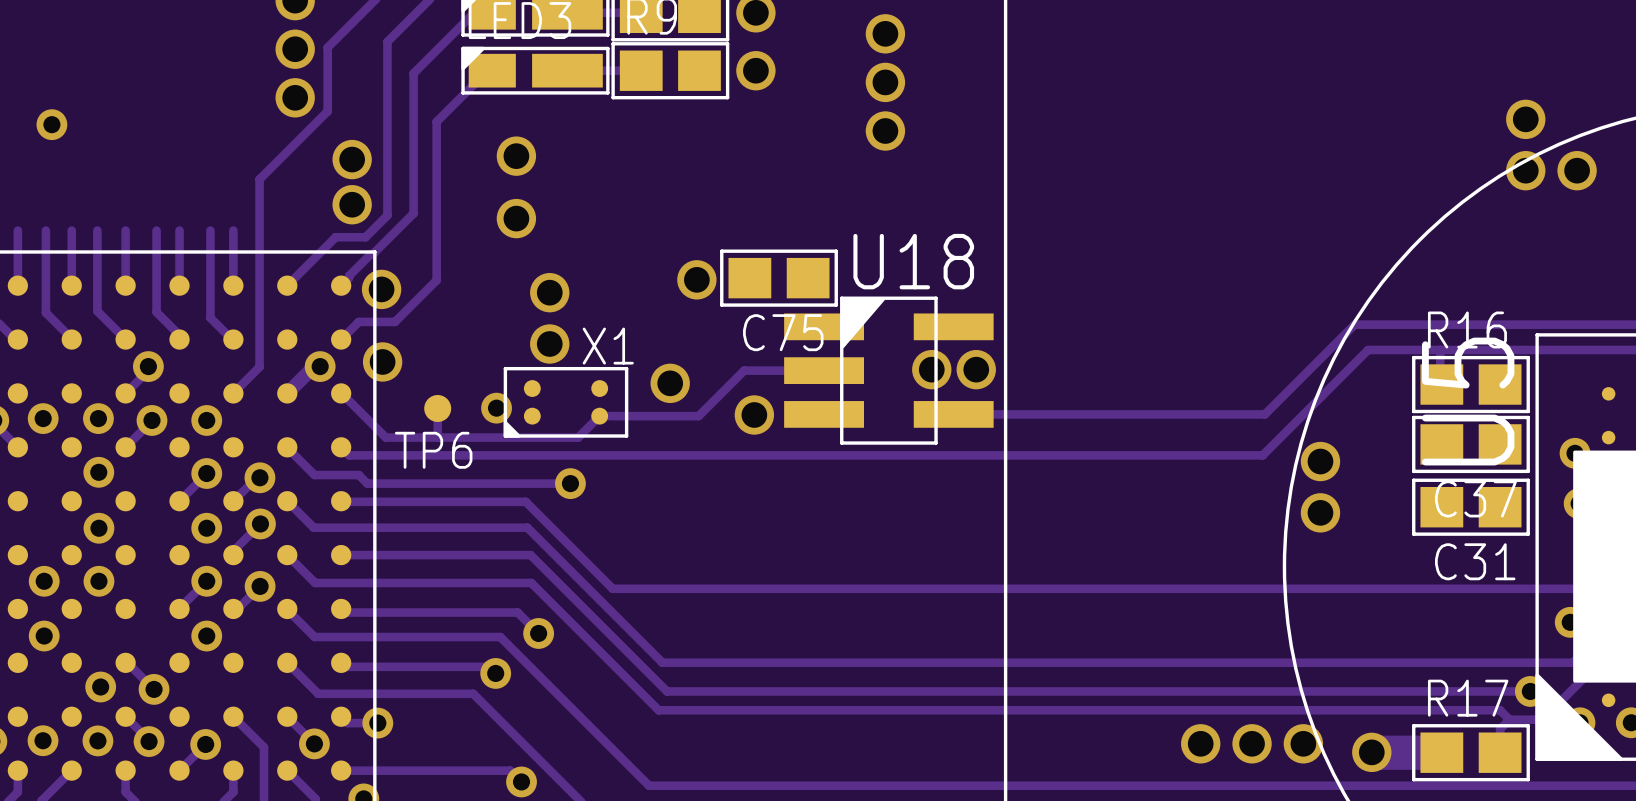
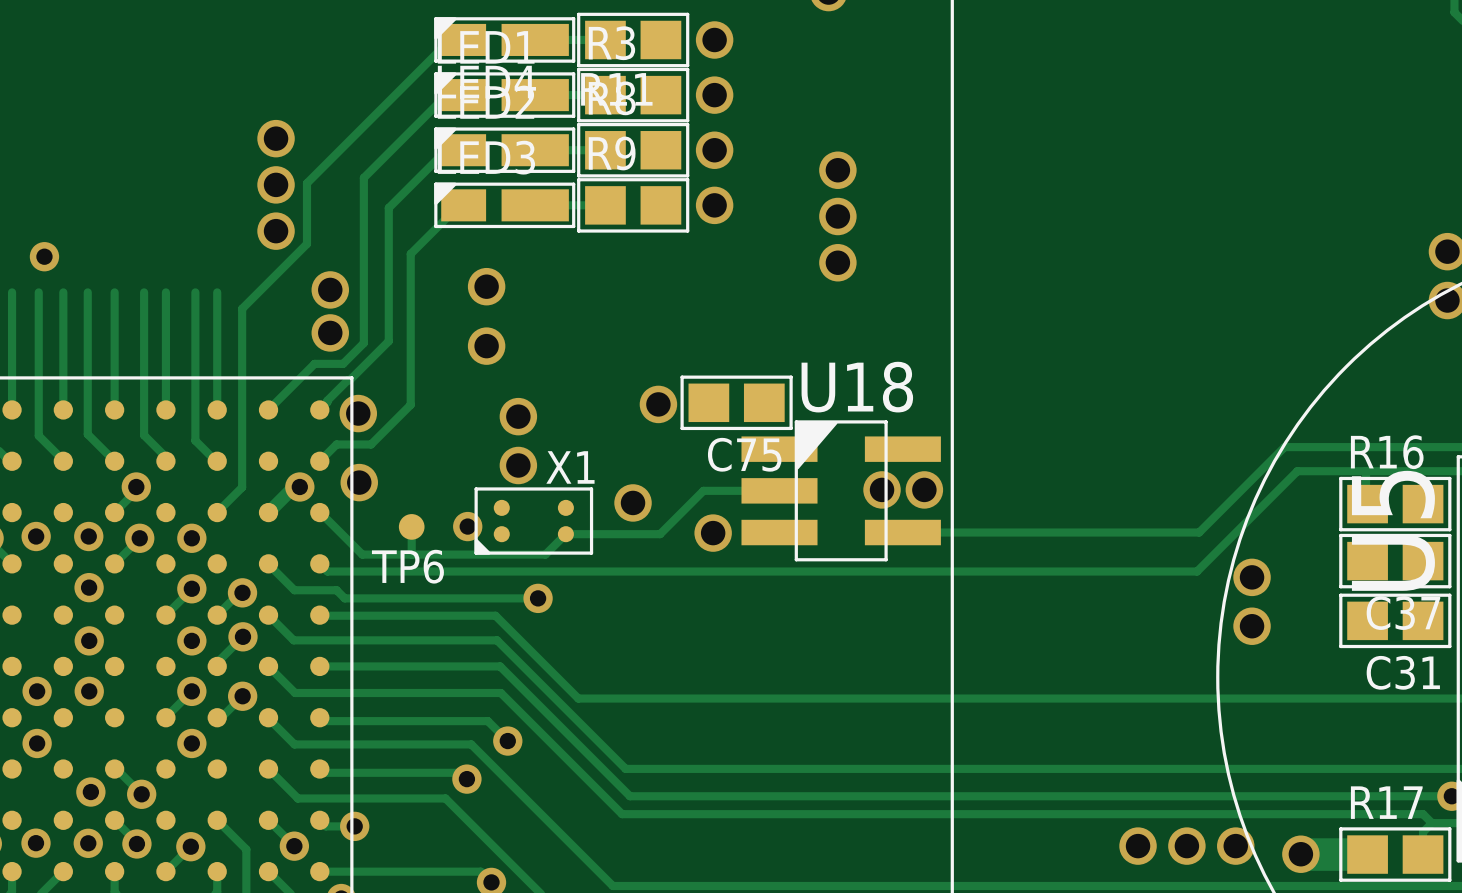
track: none -> (12, 292) (12, 357)
track: none -> (38, 292) (38, 357)
track: none -> (63, 292) (63, 357)
track: none -> (87, 292) (87, 357)
track: none -> (114, 292) (114, 357)
track: none -> (144, 292) (144, 357)
track: none -> (165, 292) (165, 357)
track: none -> (195, 292) (195, 357)
track: none -> (217, 292) (217, 357)

